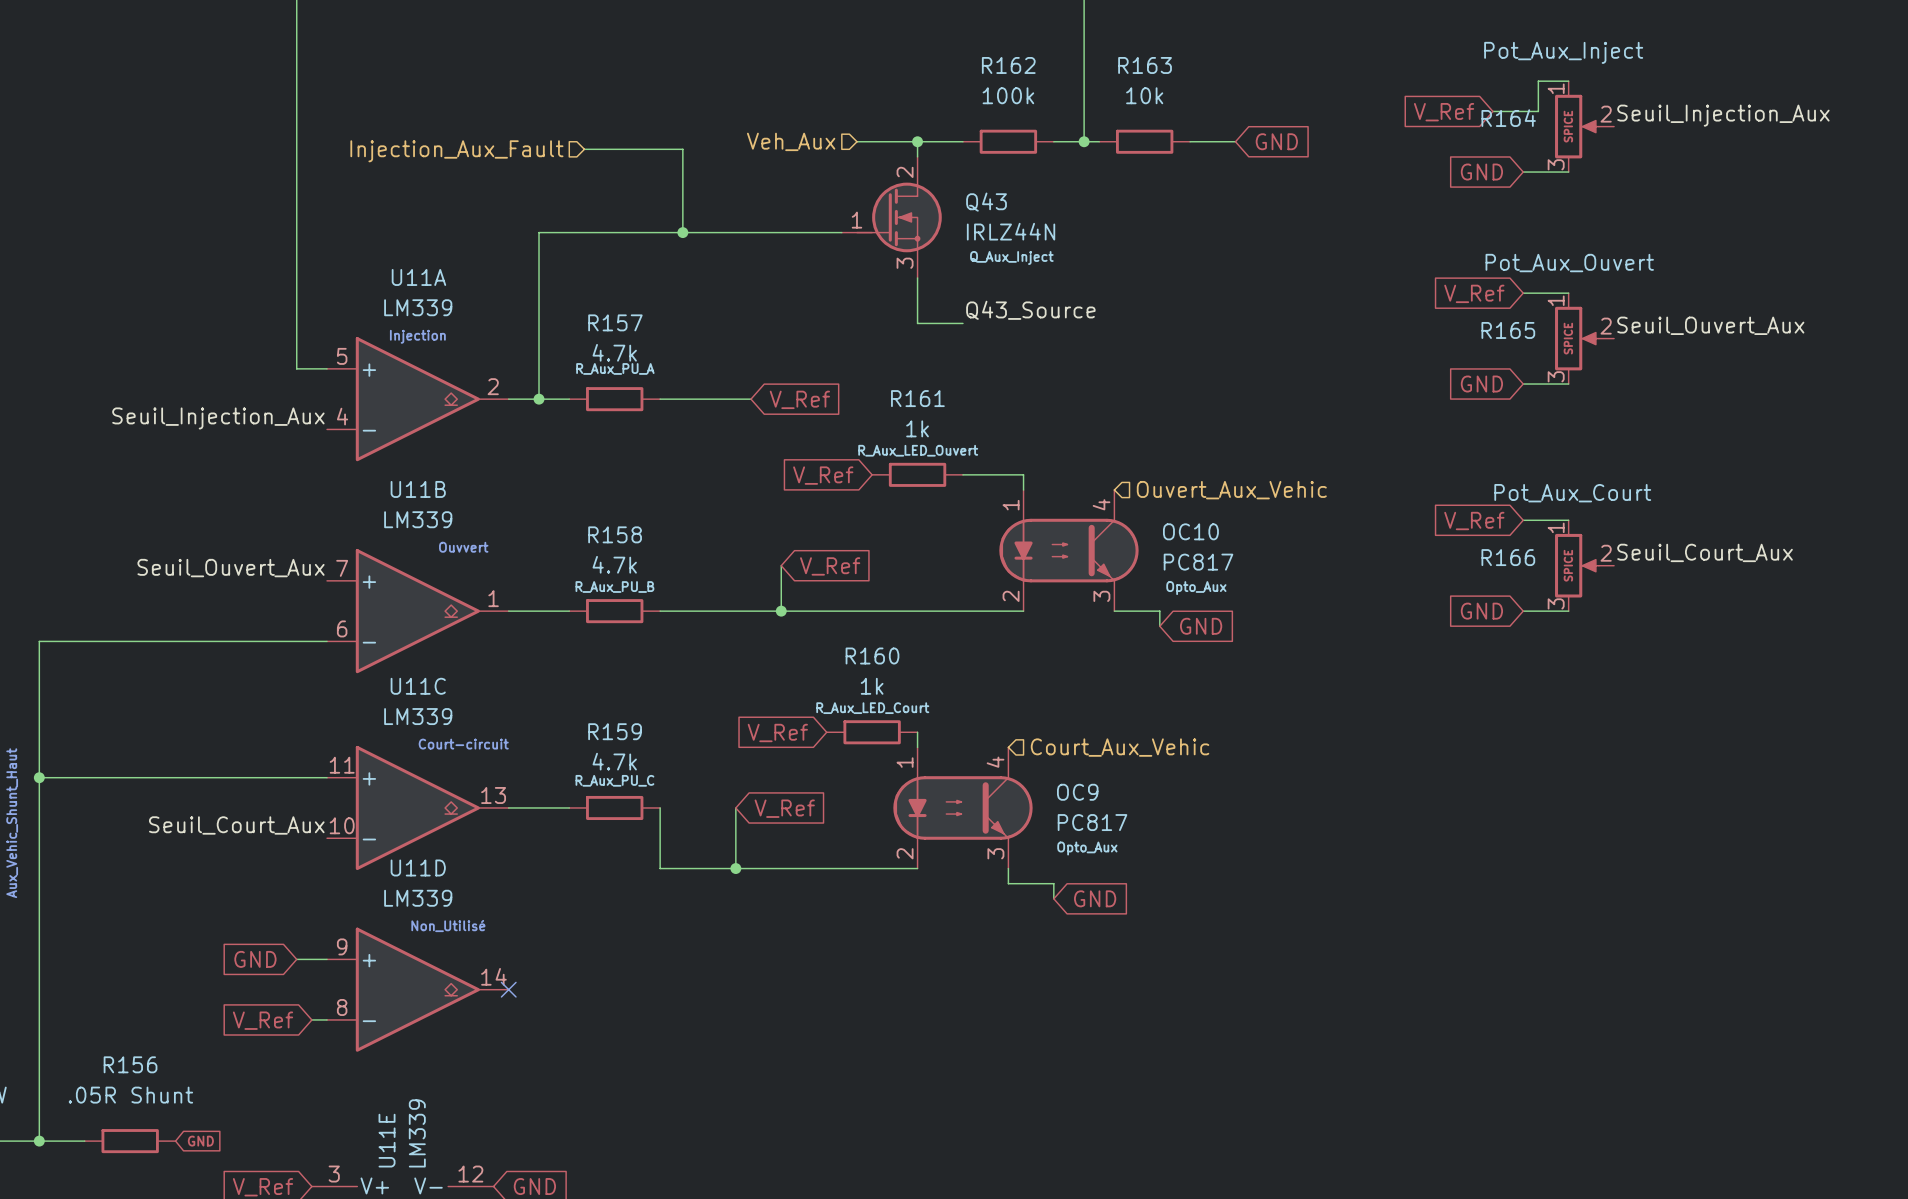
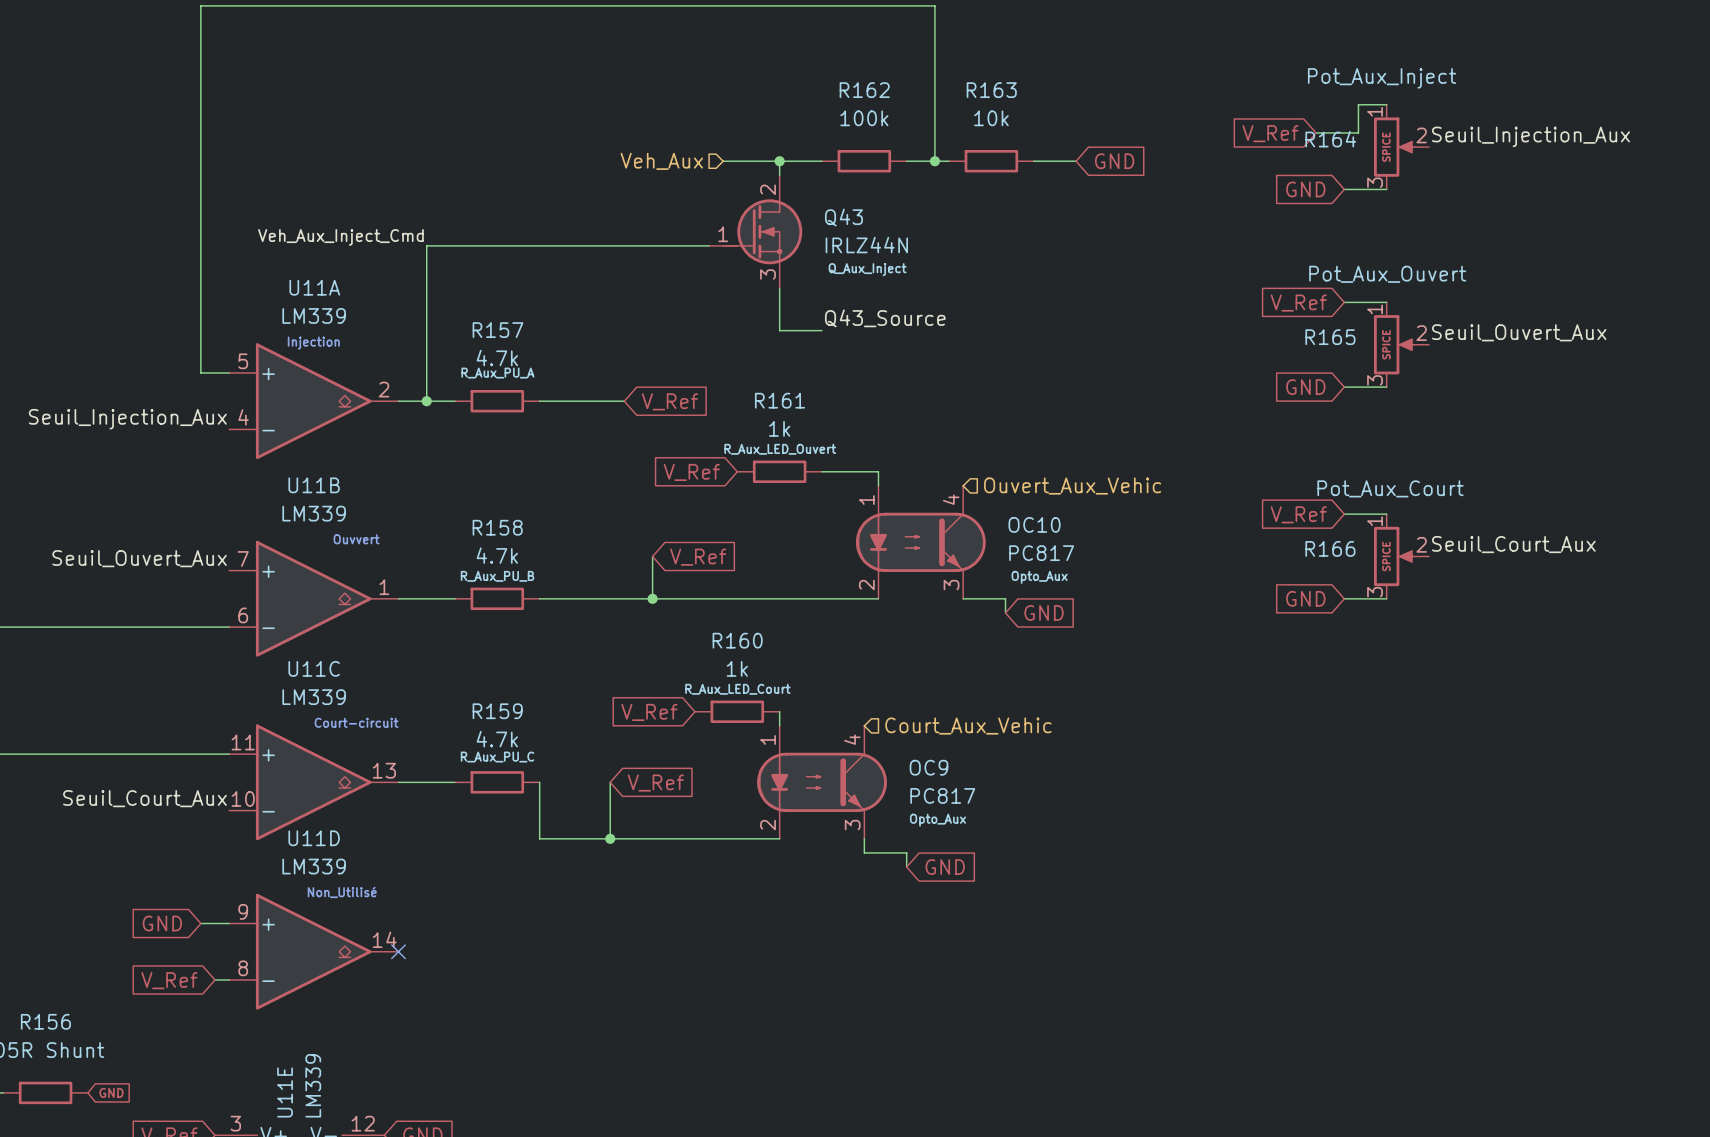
wire: (584, 149) (682, 149) (682, 232) -> none
hierarchical label: Injection_Aux_Fault (456, 151) -> none
label: none -> Veh_Aux_Inject_Cmd (340, 237)
junction: (682, 232) -> none

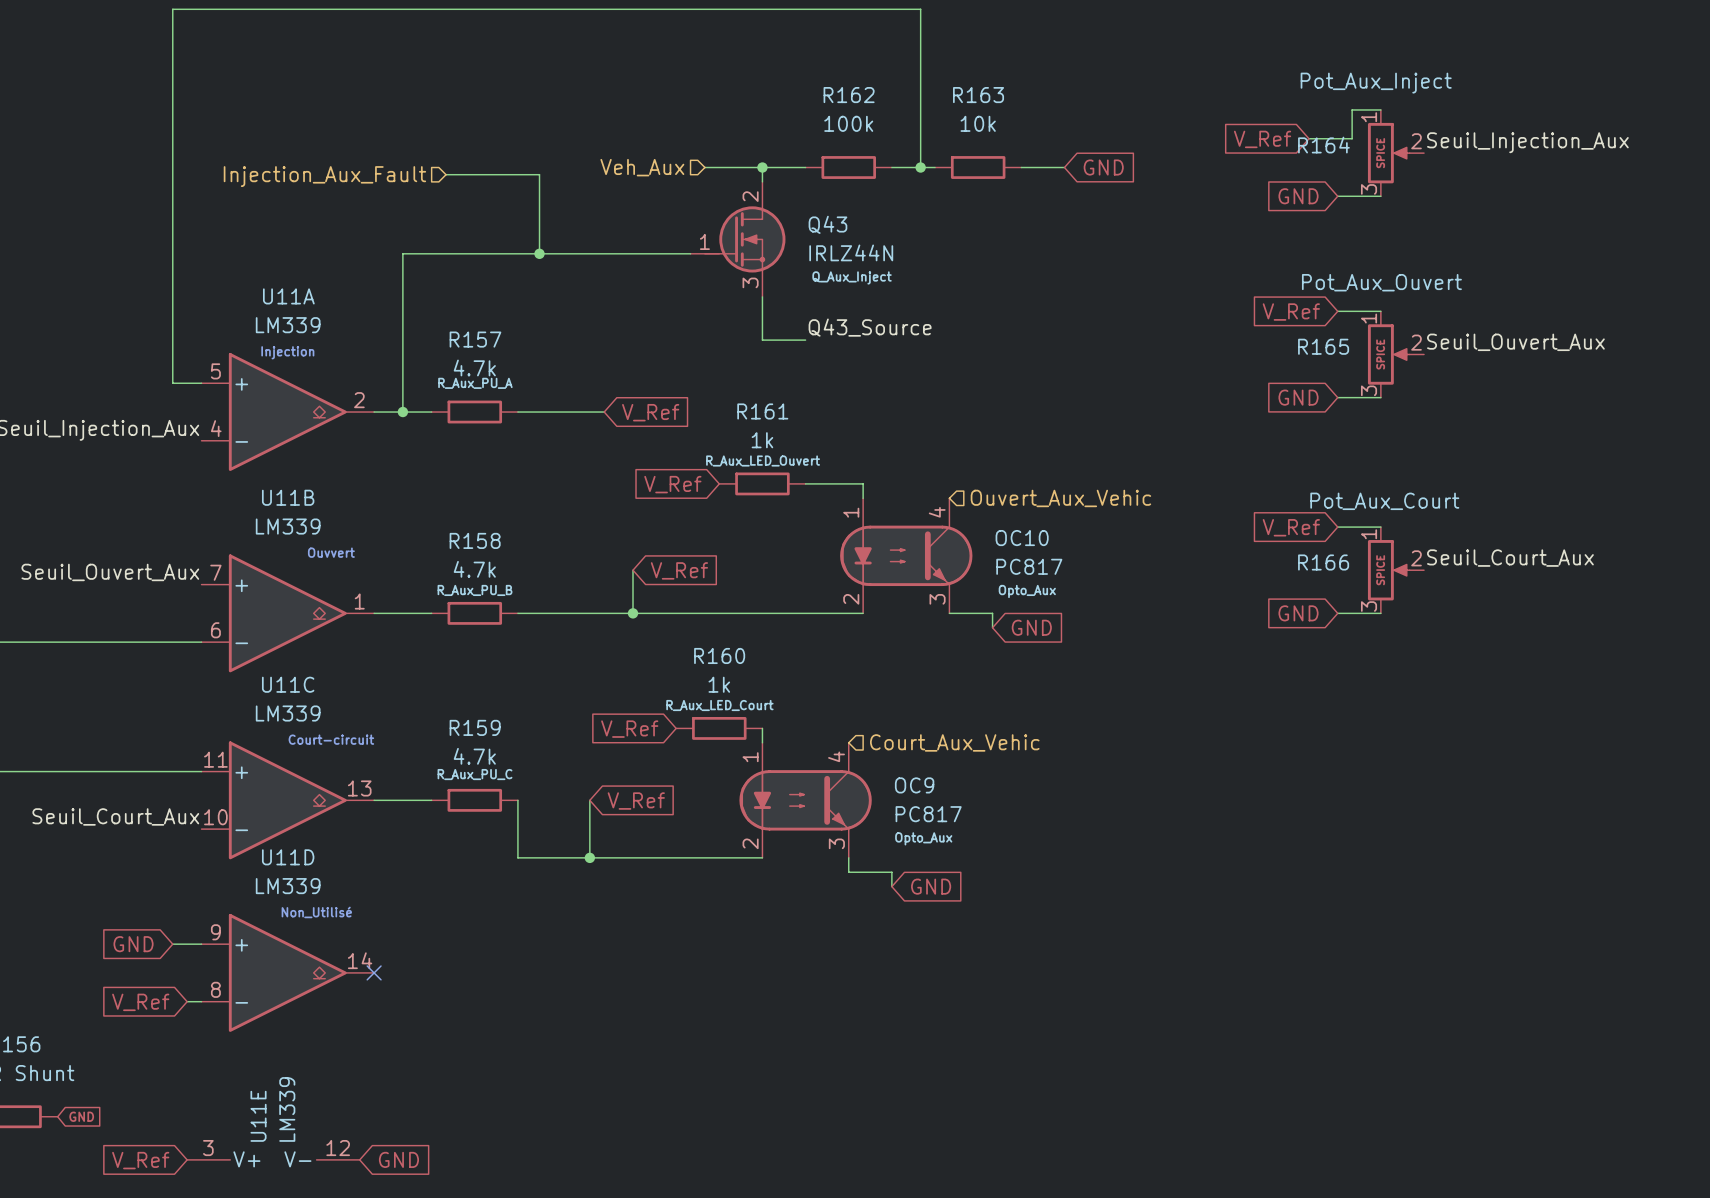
wire: none -> (446, 174) (539, 174) (539, 253)
hierarchical label: none -> Injection_Aux_Fault (324, 176)
label: Veh_Aux_Inject_Cmd (340, 237) -> none
junction: none -> (539, 253)

